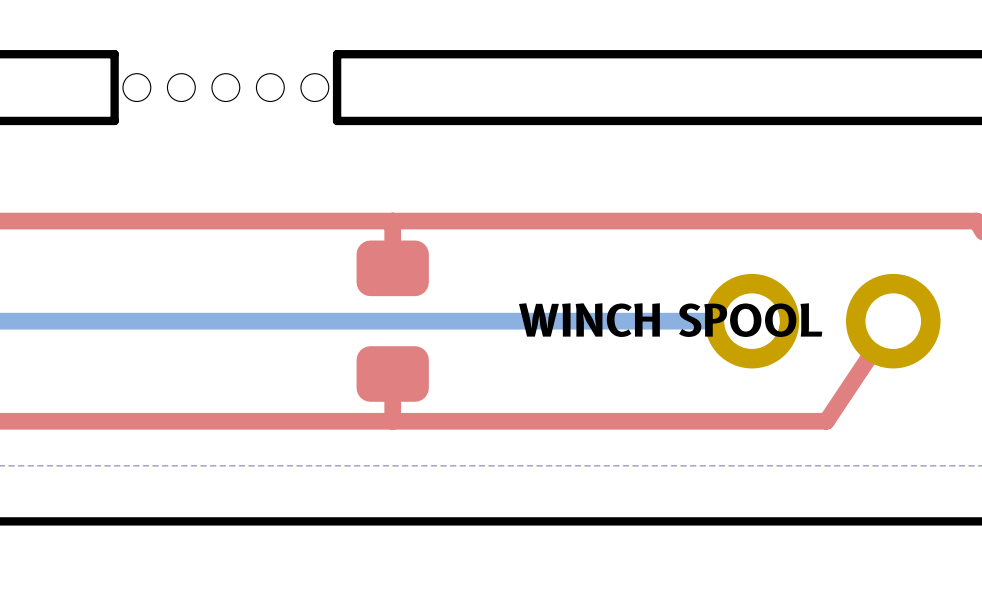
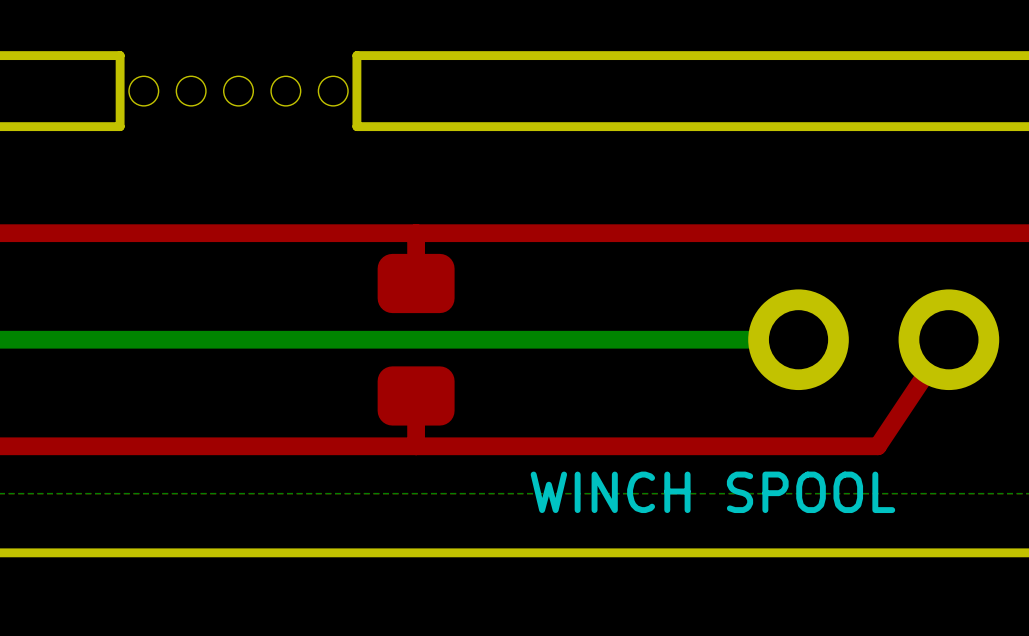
text position: WINCH SPOOL (670, 320) -> WINCH SPOOL (712, 492)

